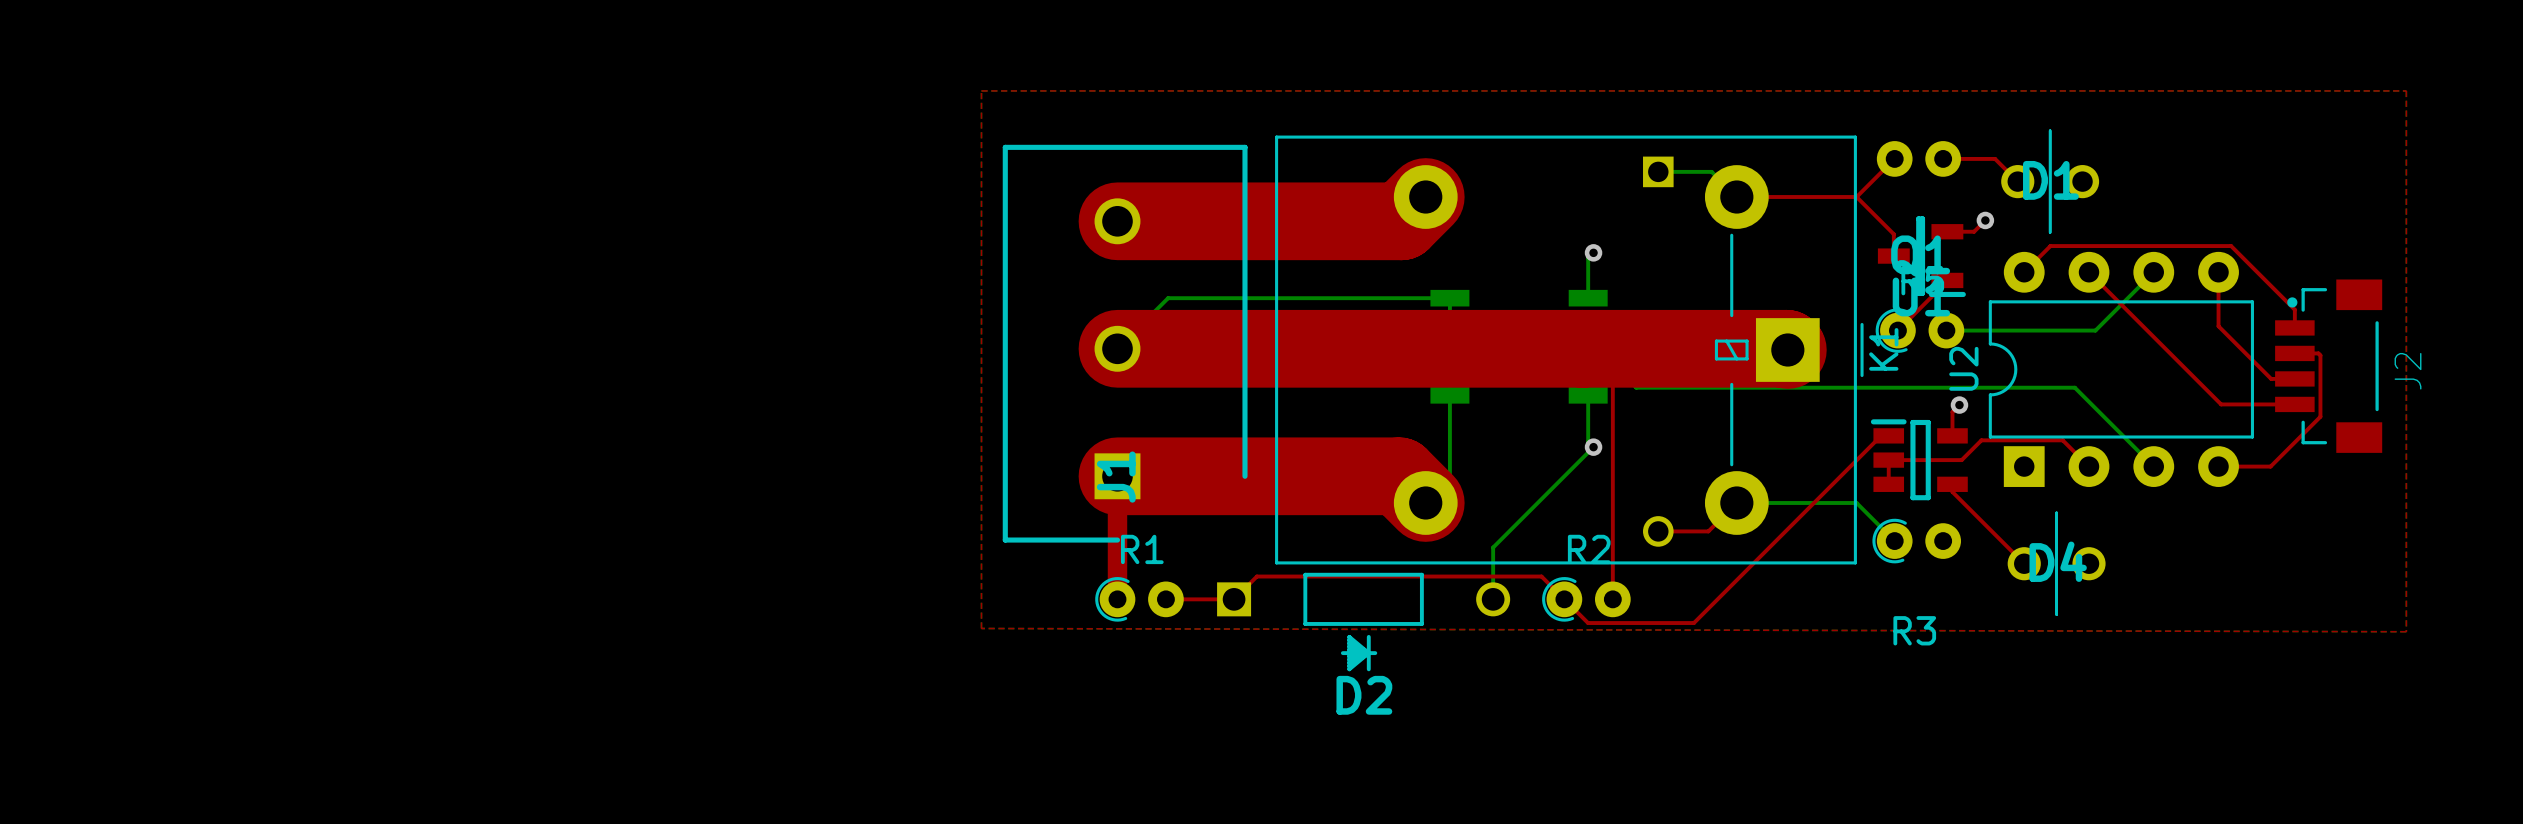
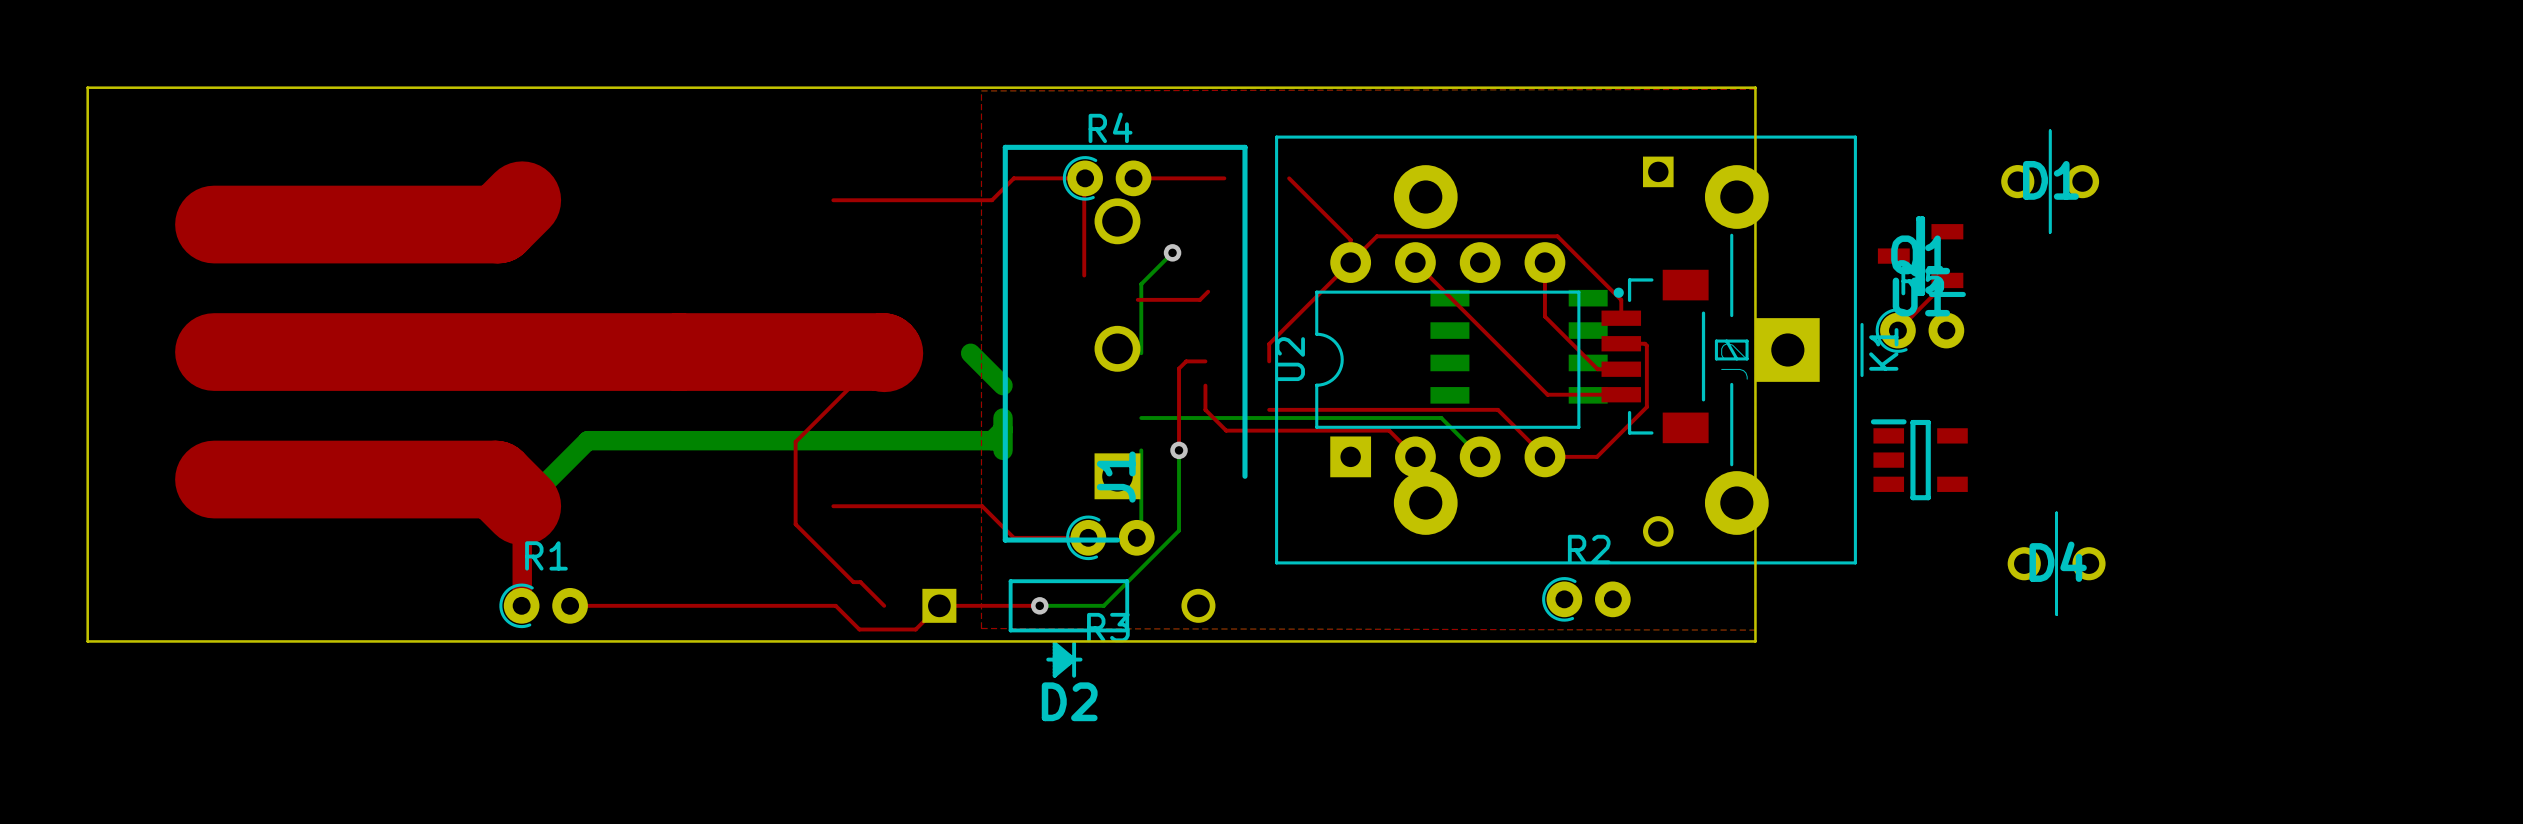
board edge: none -> (87, 87) (1755, 87) (1755, 641) (87, 641) (87, 87)
top zone outline: (981, 90) (2406, 90) (2406, 631) (981, 628) -> (981, 90) (1755, 89) (1755, 630) (981, 628)
top track: (1894, 158) (1856, 197) -> none
part: (1918, 158) -> none
top track: (1943, 158) (1995, 158) (2017, 181) -> none
bottom track: (1658, 171) (1711, 171) (1736, 197) -> none
R4: none -> (1107, 178)
top track: none -> (1133, 178) (1224, 178)
top track: none -> (1289, 178) (1350, 239) (1350, 262)
top track: (1425, 197) (1401, 221) (1117, 221) -> none
top track: (1736, 197) (1856, 197) -> none
top track: (1856, 197) (1893, 234) (1893, 256) -> none
top track: none -> (522, 200) (497, 224) (213, 224)
top track: none -> (833, 200) (991, 200) (1013, 178) (1085, 178) (1084, 275)
top track: (1985, 220) (1974, 231) (1947, 231) -> none
via: (1985, 220) -> none
bottom track: none -> (1172, 252) (1141, 284) (1141, 353)
via: none -> (1172, 252)
bottom track: (1593, 252) (1588, 258) (1588, 298) -> none
via: (1593, 252) -> none
top track: none -> (1415, 262) (1547, 394) (1621, 394)
top track: none -> (1544, 262) (1544, 316) (1597, 369) (1621, 369)
top track: (2024, 272) (2050, 246) (2231, 246) (2294, 309) (2294, 327) -> none
top track: (2089, 272) (2221, 404) (2294, 404) -> none
bottom track: (2153, 272) (2095, 330) (1946, 330) -> none
top track: (2218, 272) (2218, 326) (2271, 378) (2294, 378) -> none
top track: none -> (1208, 291) (1200, 299) (1137, 299)
top track: none -> (1621, 318) (1621, 300) (1557, 236) (1376, 236) (1269, 344) (1269, 361)
bottom track: (1449, 330) (1449, 298) (1168, 298) (1117, 348) -> none
top track: none -> (1621, 343) (1644, 343) (1646, 345) (1646, 407) (1597, 456) (1544, 456) (1497, 409) (1269, 409)
top track: (1117, 348) (1787, 350) -> none
top track: (1582, 348) (1612, 379) (1612, 599) -> none
top track: none -> (213, 352) (883, 352) (884, 353) (795, 441) (795, 524) (853, 582) (860, 582) (884, 605)
bottom track: none -> (970, 353) (1003, 385)
top track: (2294, 353) (2318, 353) (2320, 355) (2320, 416) (2270, 466) (2218, 466) -> none
top track: none -> (1205, 361) (1186, 361) (1179, 368) (1179, 450)
bottom track: (1449, 362) (1449, 478) (1425, 502) -> none
bottom track: (1588, 362) (1611, 362) (1636, 387) (2074, 387) (2153, 466) -> none
J2 position: (2328, 366) -> (1655, 356)
U2 position: (2121, 369) -> (1447, 359)
top track: none -> (1205, 385) (1205, 409) (1226, 430) (1389, 430) (1415, 456)
bottom track: (1588, 395) (1588, 441) (1593, 447) (1493, 547) (1493, 599) -> none
top track: (1959, 405) (1952, 412) (1952, 435) -> none
via: (1959, 405) -> none
bottom track: none -> (1003, 418) (1003, 450)
bottom track: none -> (1141, 418) (1441, 418) (1480, 456)
bottom track: none -> (1003, 429) (992, 440) (587, 440) (522, 506)
top track: (1888, 435) (1881, 435) (1693, 623) (1588, 623) (1541, 576) (1256, 576) (1234, 599) (1165, 599) -> none
via: (1593, 447) -> none
bottom track: none -> (1141, 450) (1141, 533) (1136, 537)
bottom track: none -> (1179, 450) (1179, 530) (1103, 605) (1039, 605)
via: none -> (1179, 450)
top track: (2089, 466) (2062, 440) (1981, 440) (1961, 460) (1888, 460) (1888, 484) -> none
top track: none -> (213, 479) (495, 479) (522, 506) (521, 605)
top track: (1952, 484) (1952, 491) (2024, 563) -> none
top track: (1425, 502) (1399, 476) (1117, 476) (1117, 599) -> none
top track: (1736, 502) (1708, 531) (1658, 531) -> none
bottom track: (1736, 502) (1856, 502) (1894, 541) -> none
top track: none -> (833, 506) (982, 506) (1013, 537) (1088, 537)
R3 position: (1916, 541) -> (1110, 537)
R1 position: (1139, 599) -> (543, 605)
top track: none -> (570, 605) (835, 605) (859, 629) (915, 629) (939, 605) (1039, 605)
via: none -> (1039, 605)
D2 position: (1363, 622) -> (1068, 628)

